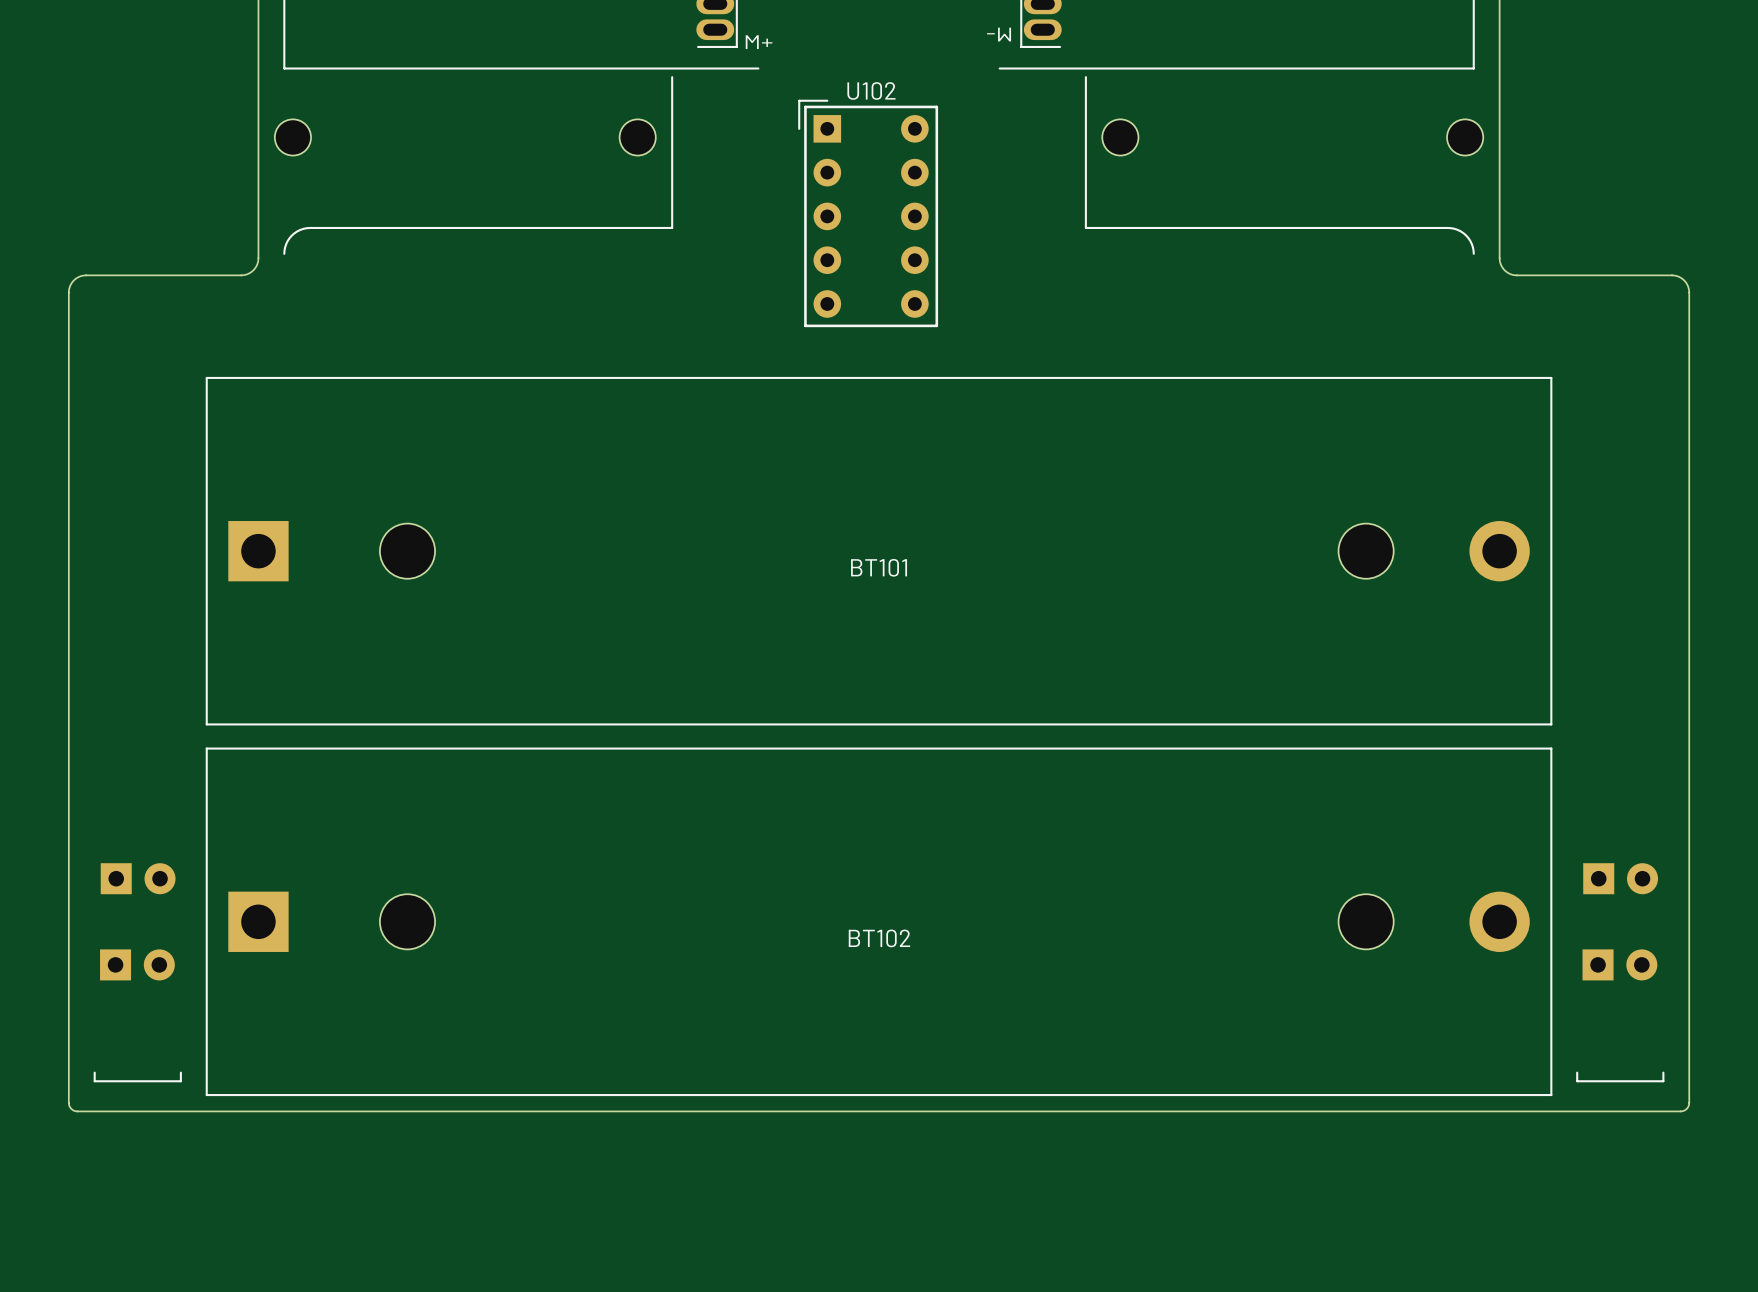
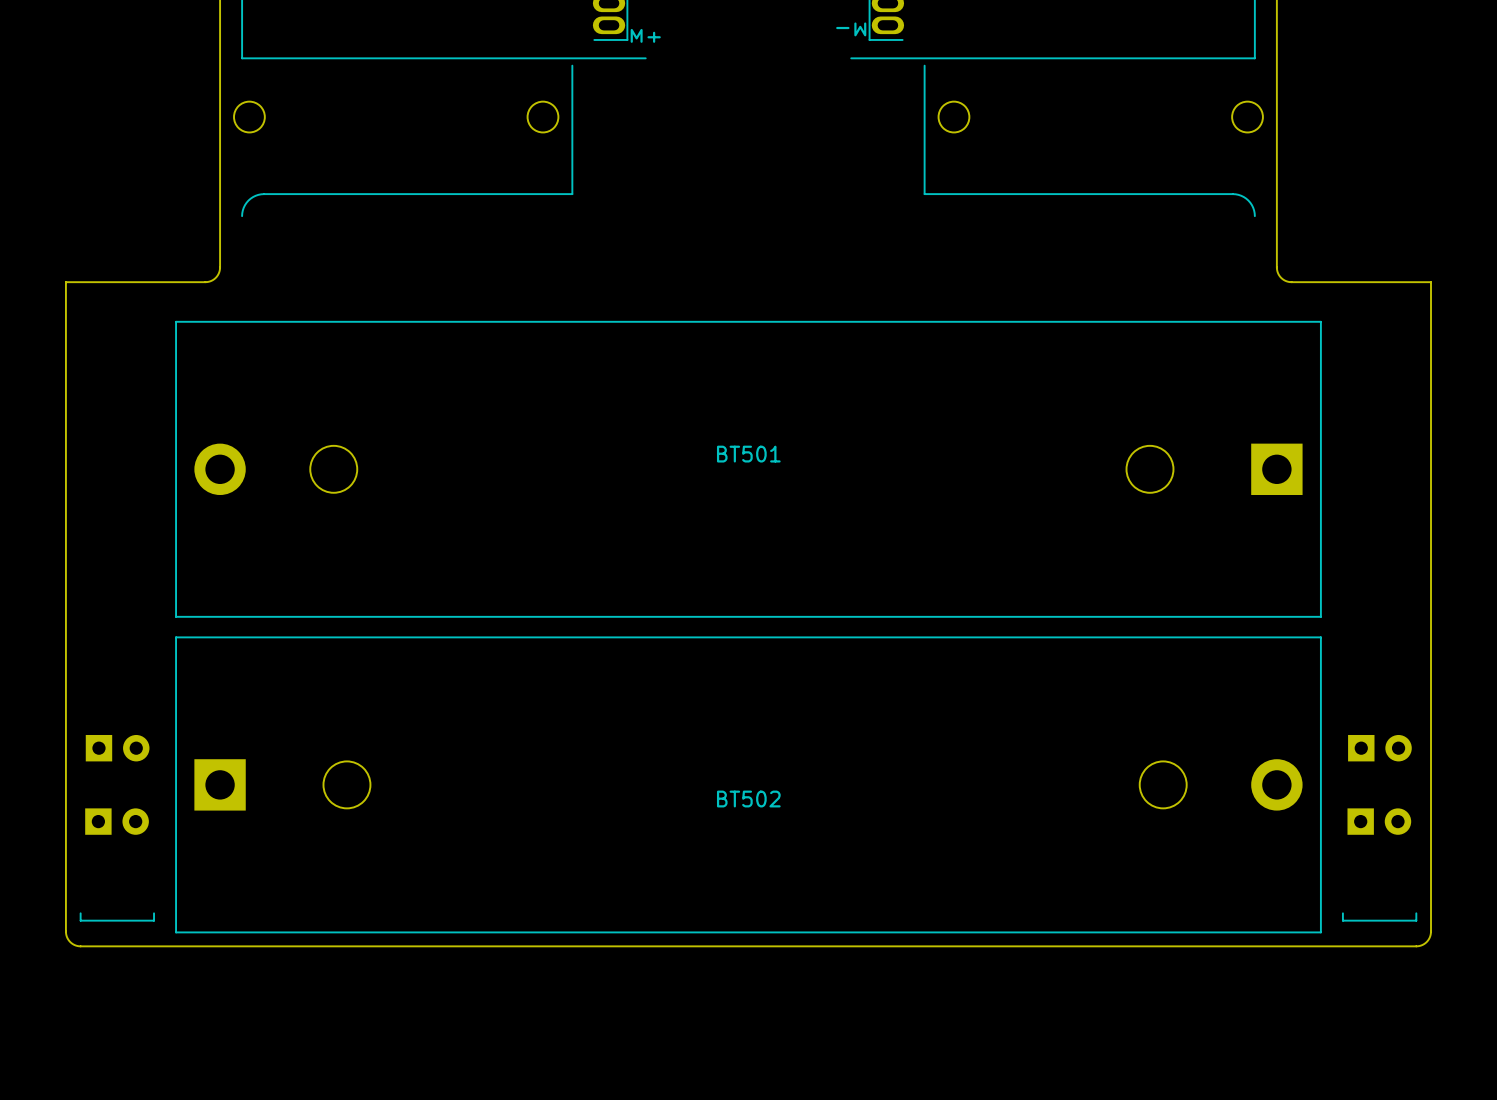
U102: (868, 213) -> none
board edge: (258, 258) (253, 270) (243, 275) (84, 275) (73, 280) (69, 288) (68, 1102) (70, 1108) (75, 1111) (94, 1111) -> (220, 219) (219, 269) (216, 276) (210, 281) (65, 282) (65, 931) (70, 942) (80, 946)
board edge: (1499, 258) (1504, 270) (1514, 275) (1673, 275) (1684, 280) (1688, 288) (1689, 1102) (1687, 1108) (1682, 1111) (1663, 1111) -> (1276, 219) (1276, 269) (1280, 276) (1286, 281) (1431, 282) (1431, 931) (1426, 942) (1416, 946)
BT101: (879, 551) -> none
BT501: none -> (748, 469)
BT102 name: BT102 (879, 938) -> BT502 (748, 799)

